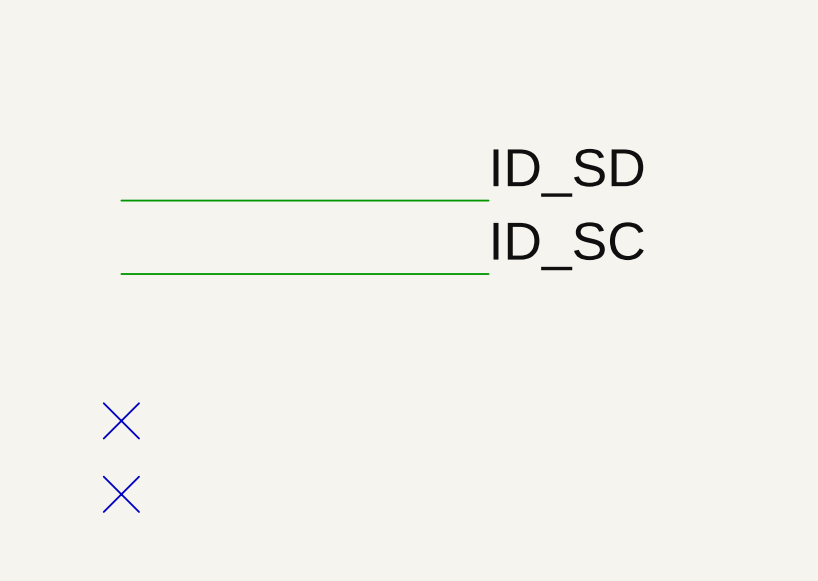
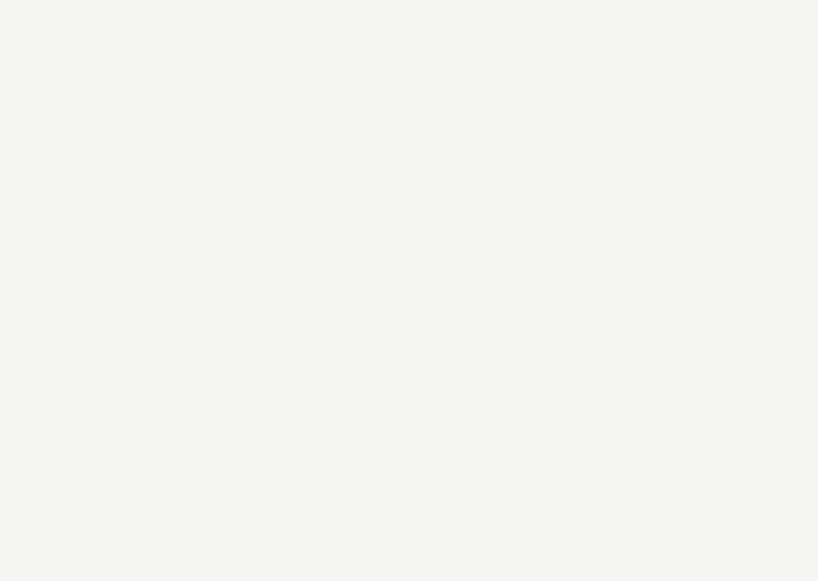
label: ID_SD (568, 172) -> none
wire: (121, 200) (488, 200) -> none
label: ID_SC (568, 246) -> none
wire: (121, 274) (488, 274) -> none
no-connect mark: (121, 420) -> none
no-connect mark: (121, 494) -> none

